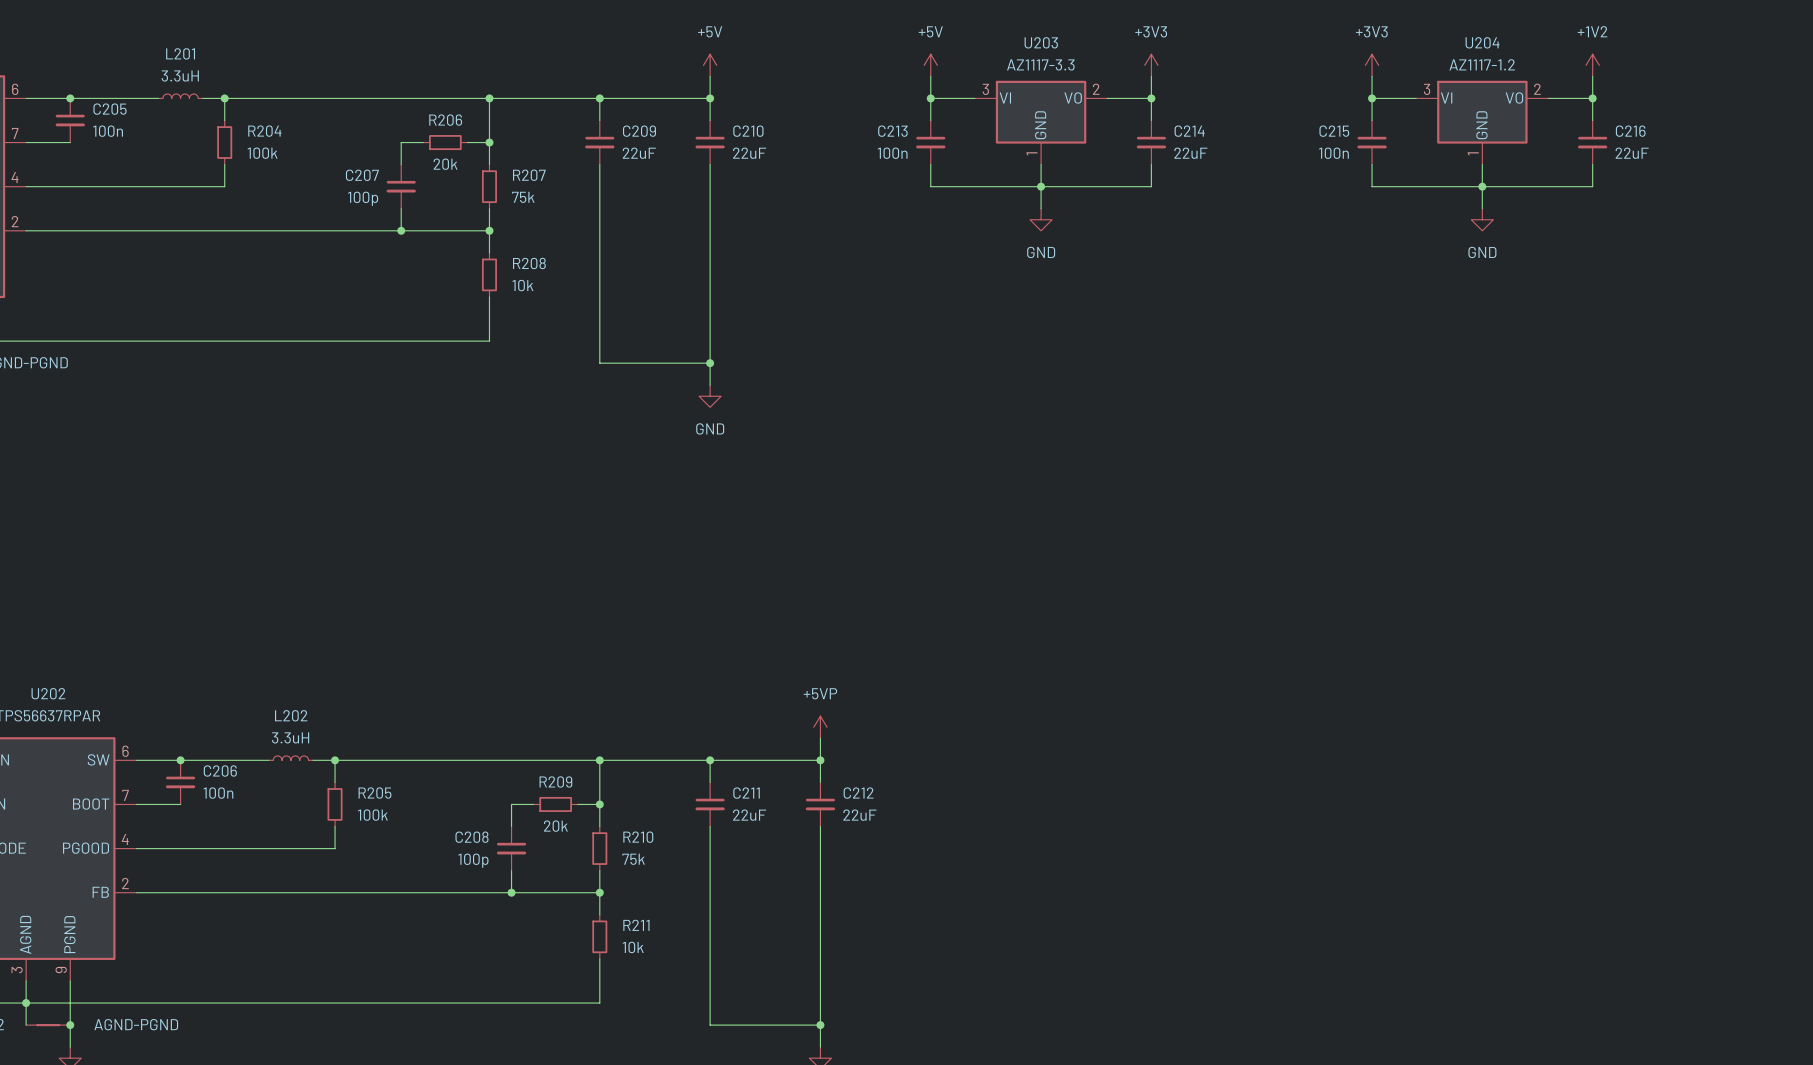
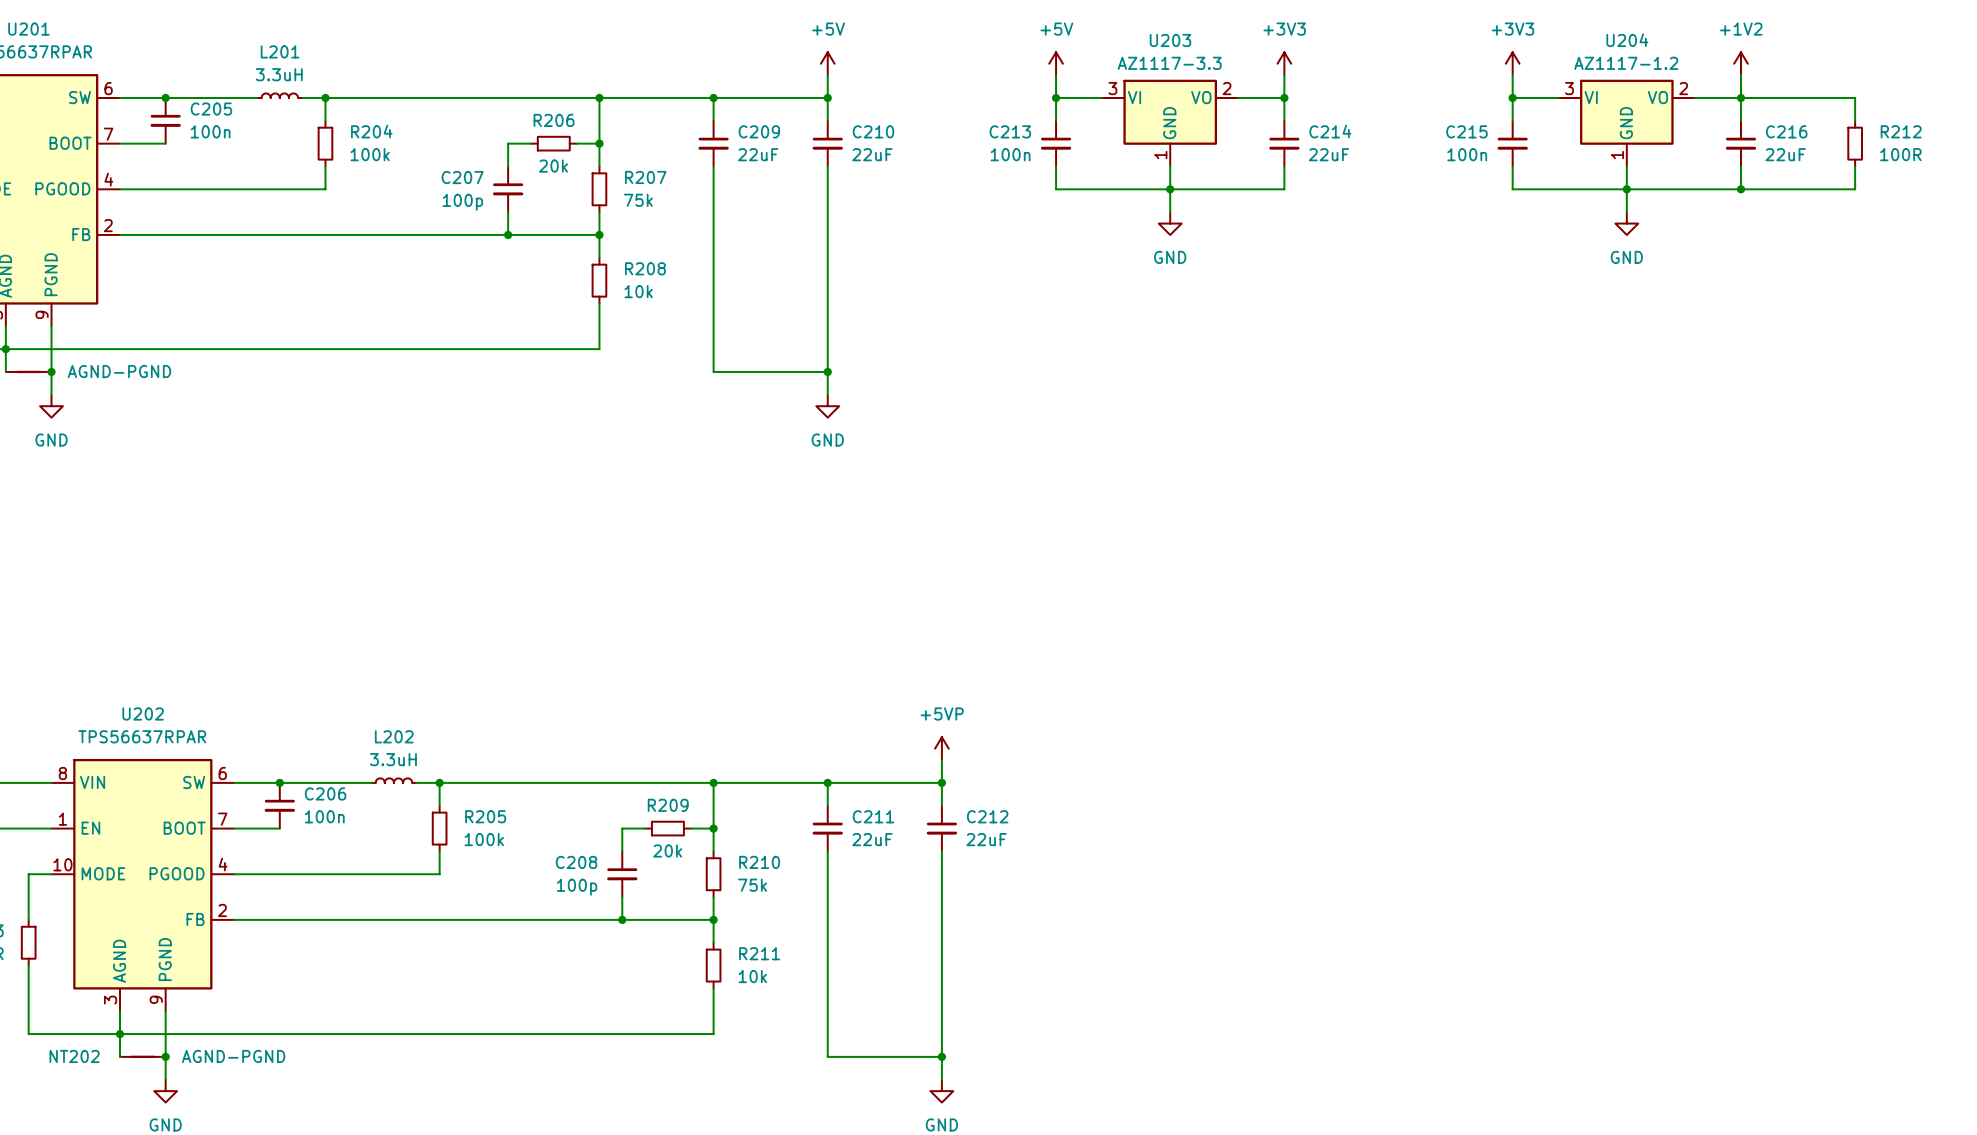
wire: none -> (1740, 97) (1855, 97) (1855, 120)
R212: none -> 100R (1855, 143)
wire: none -> (1855, 166) (1855, 189) (1740, 189)
junction: none -> (1740, 189)

